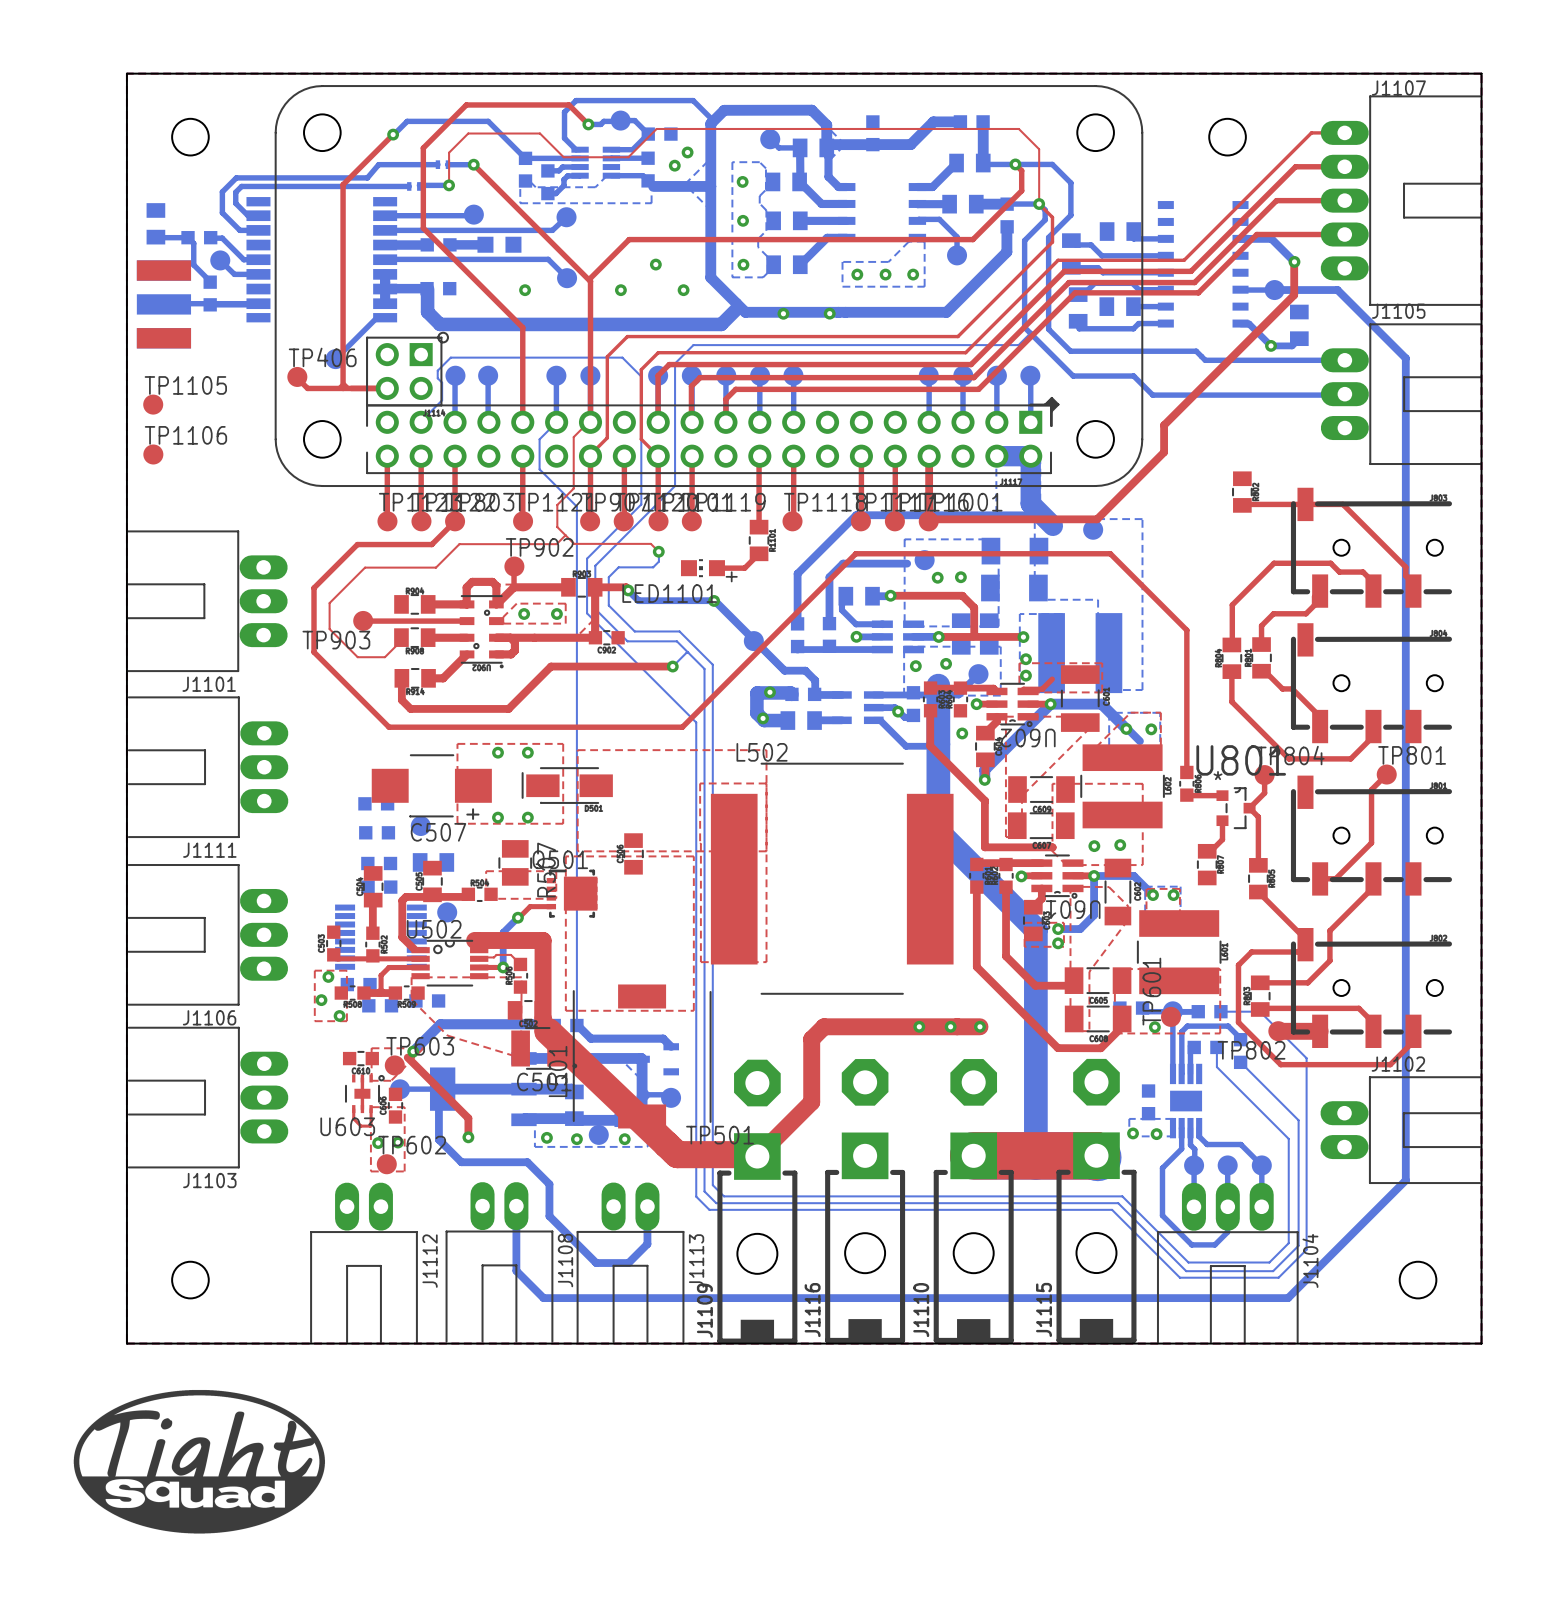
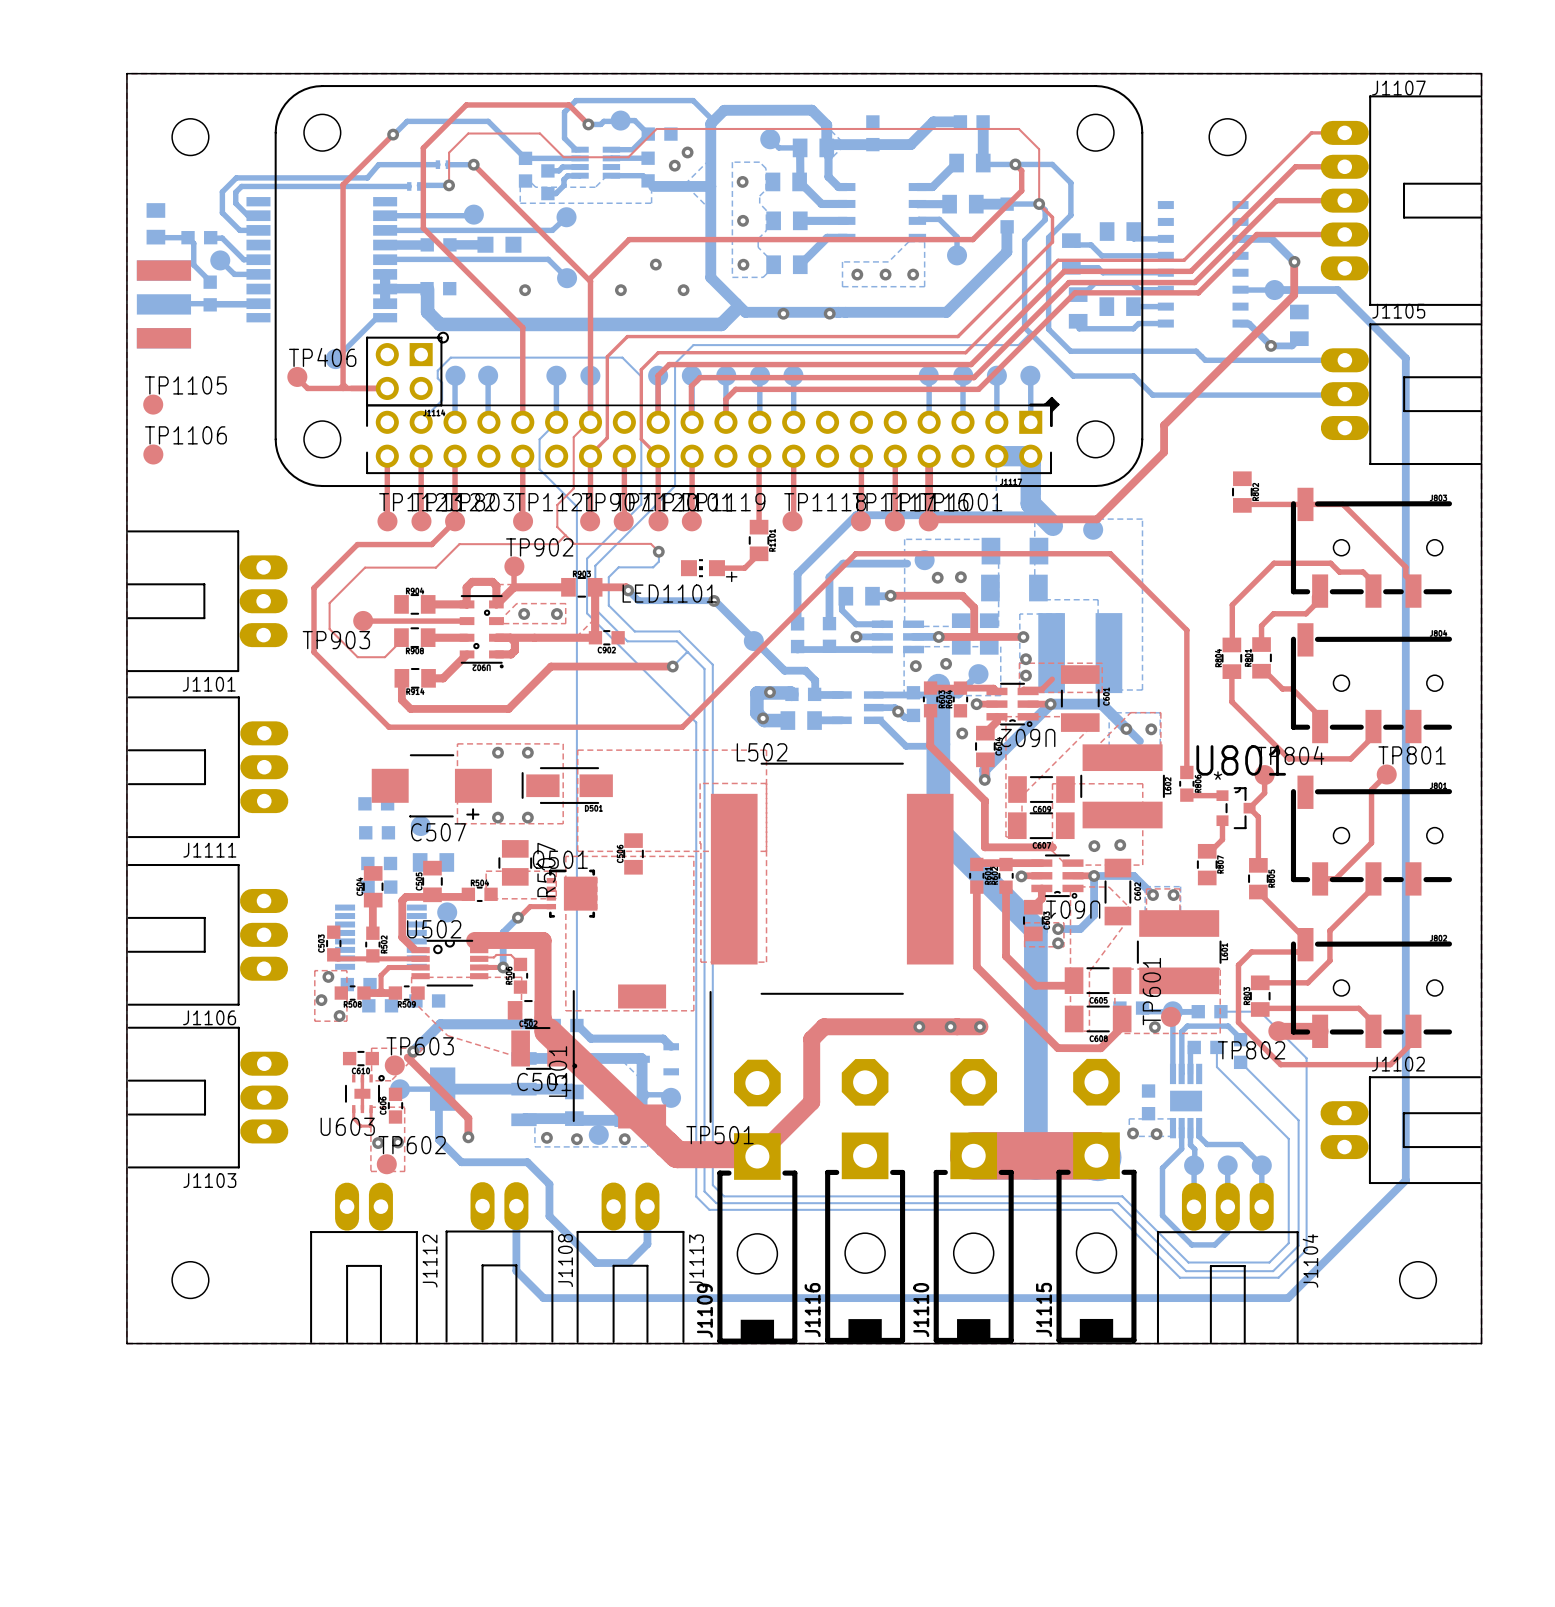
drawing: [73, 1389, 326, 1534] -> none

